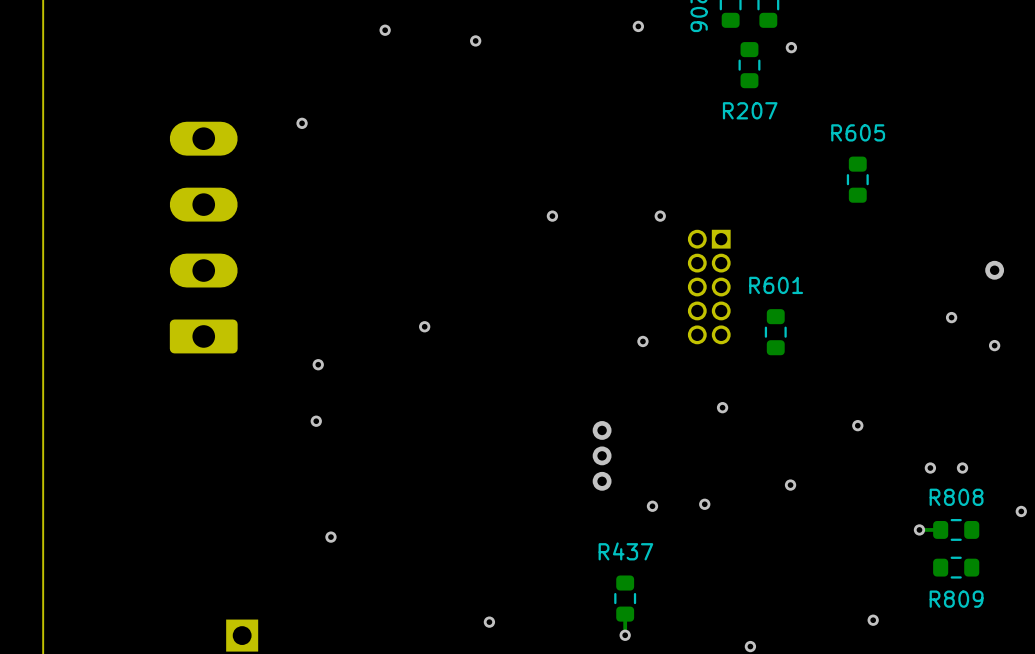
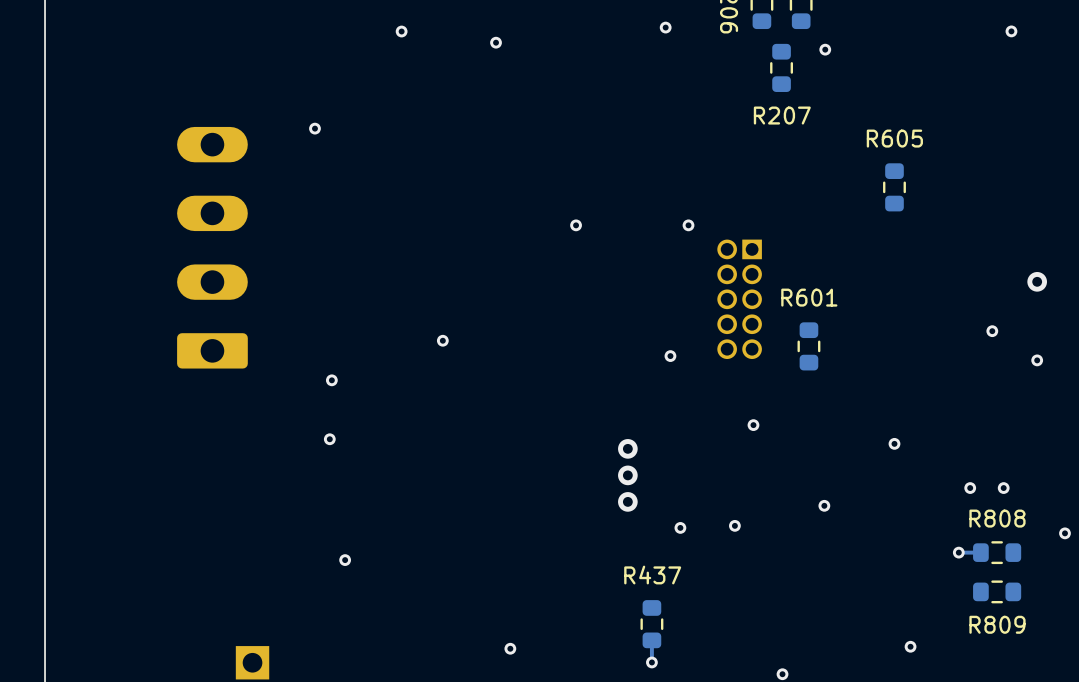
via: none -> (1011, 31)

